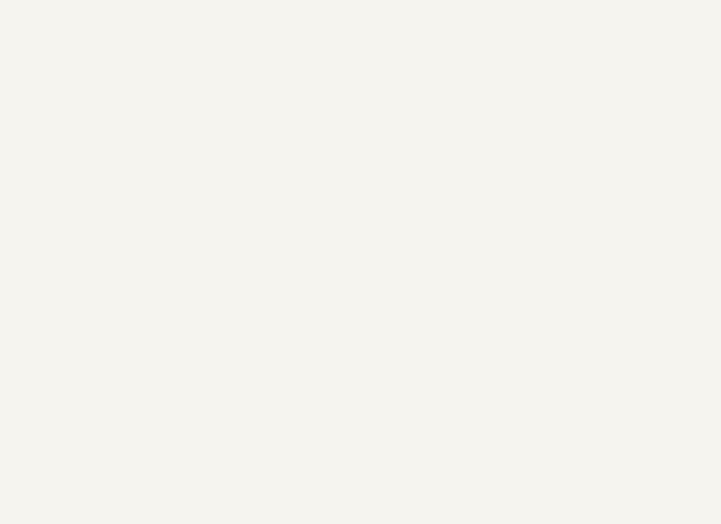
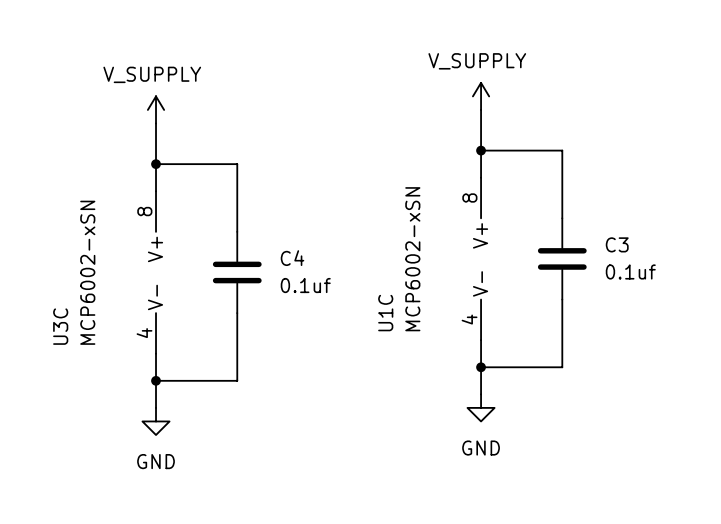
power symbol: none -> V_SUPPLY (481, 96)
power symbol: none -> V_SUPPLY (156, 109)
wire: none -> (481, 109) (481, 177)
wire: none -> (156, 123) (156, 191)
wire: none -> (481, 150) (562, 150) (562, 218)
junction: none -> (481, 150)
wire: none -> (156, 164) (237, 164) (237, 231)
junction: none -> (156, 164)
U1C: none -> MCP6002-xSN (481, 258)
C3: none -> 0.1uf (562, 258)
U3C: none -> MCP6002-xSN (156, 272)
C4: none -> 0.1uf (237, 272)
wire: none -> (562, 299) (562, 367) (481, 367)
wire: none -> (237, 313) (237, 380) (156, 380)
wire: none -> (481, 340) (481, 394)
wire: none -> (156, 353) (156, 407)
junction: none -> (481, 367)
junction: none -> (156, 380)
power symbol: none -> GND (481, 407)
power symbol: none -> GND (156, 421)

